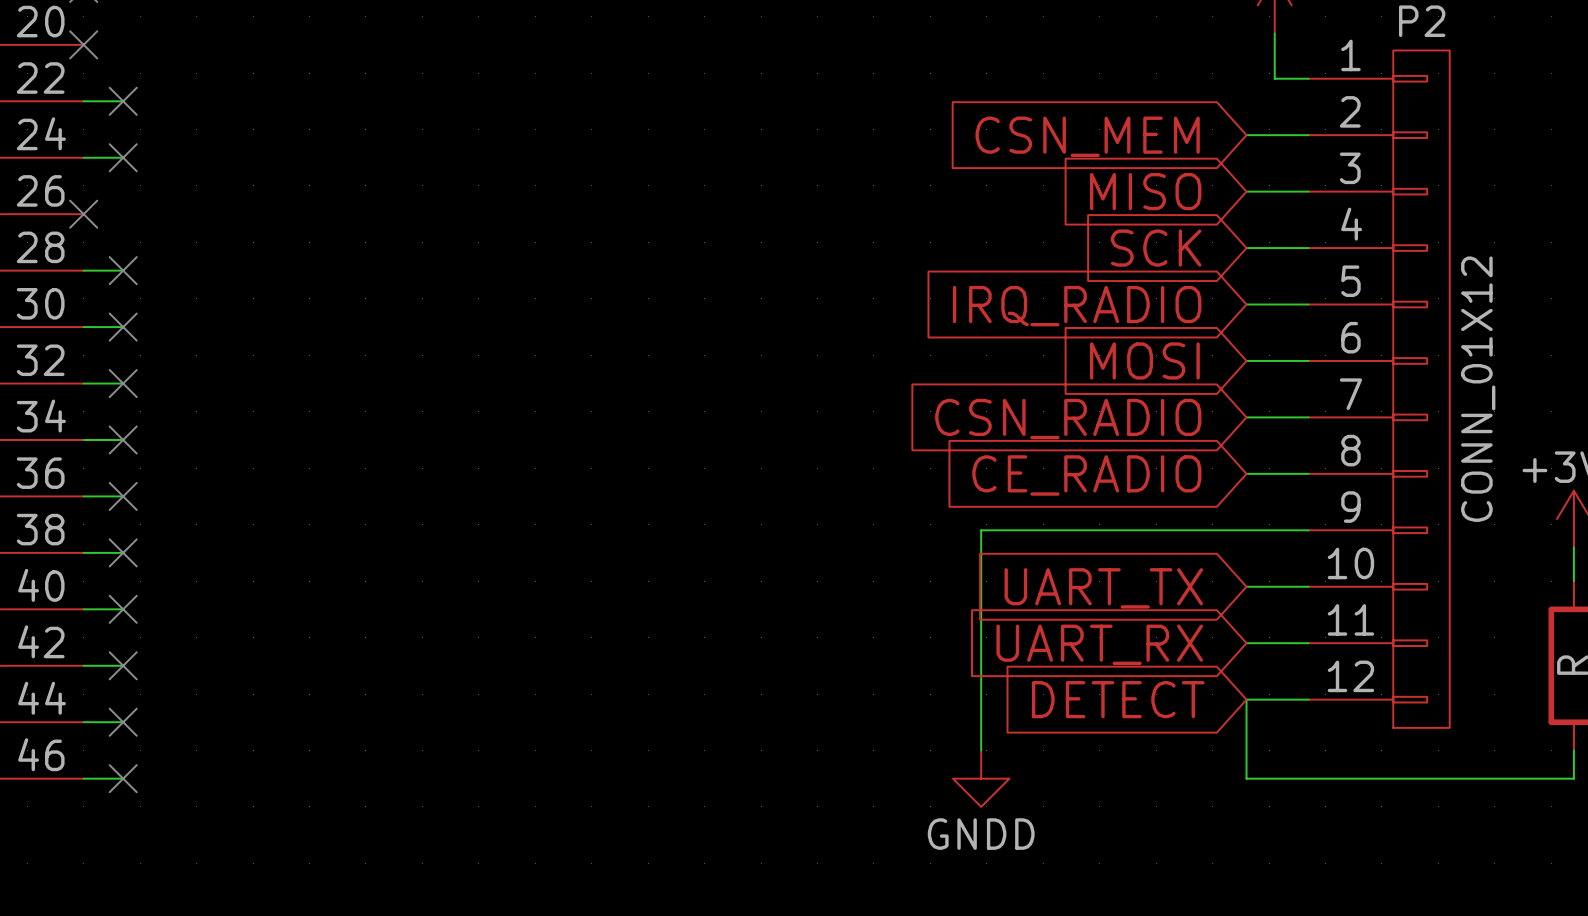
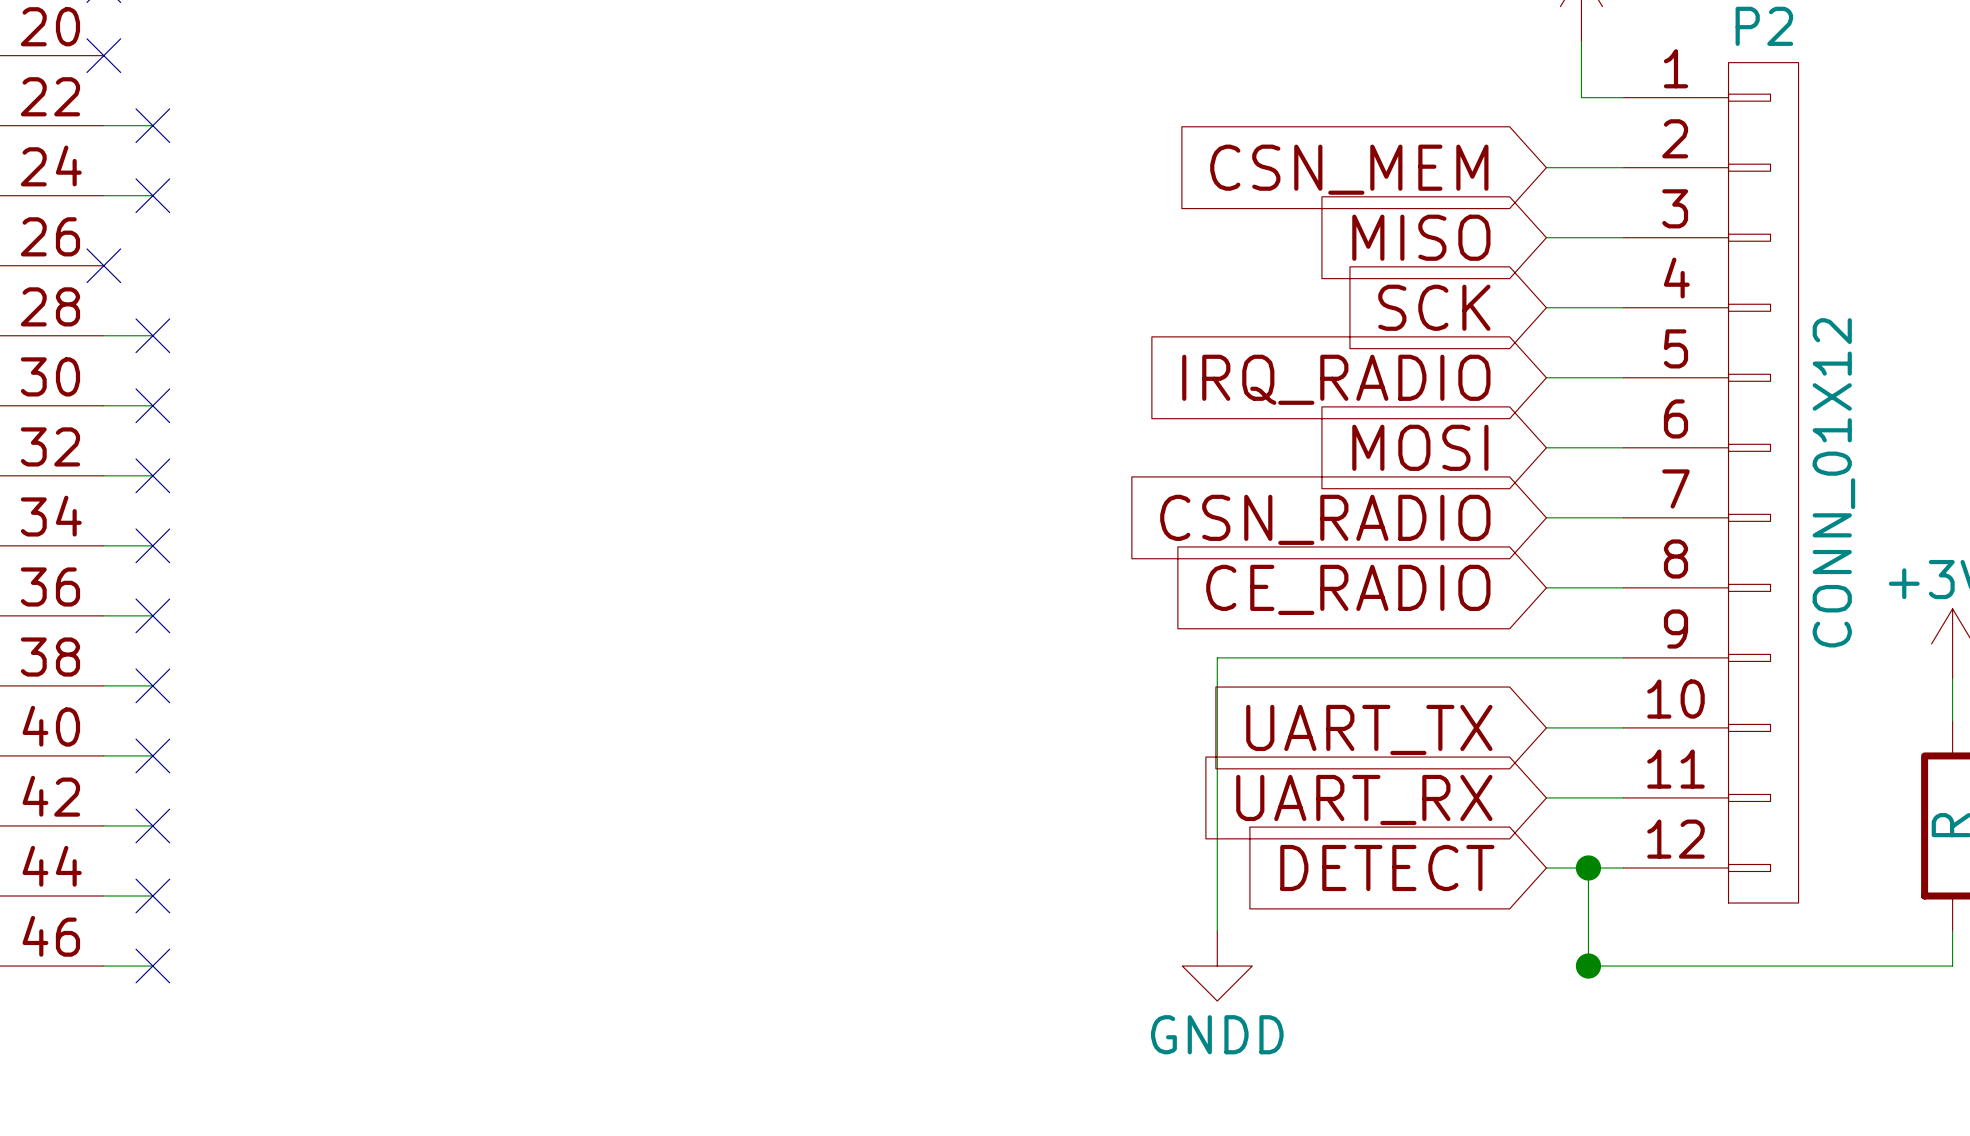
wire: (1246, 699) (1246, 778) (1280, 778) -> (1588, 867) (1588, 966)
junction: none -> (1588, 867)
junction: none -> (1588, 966)

